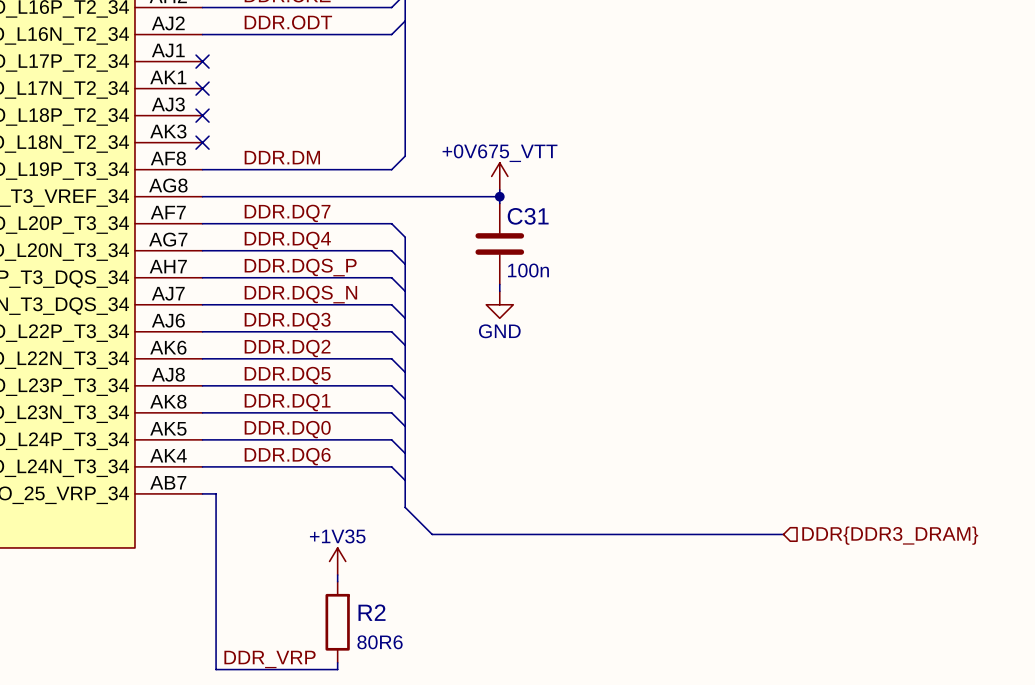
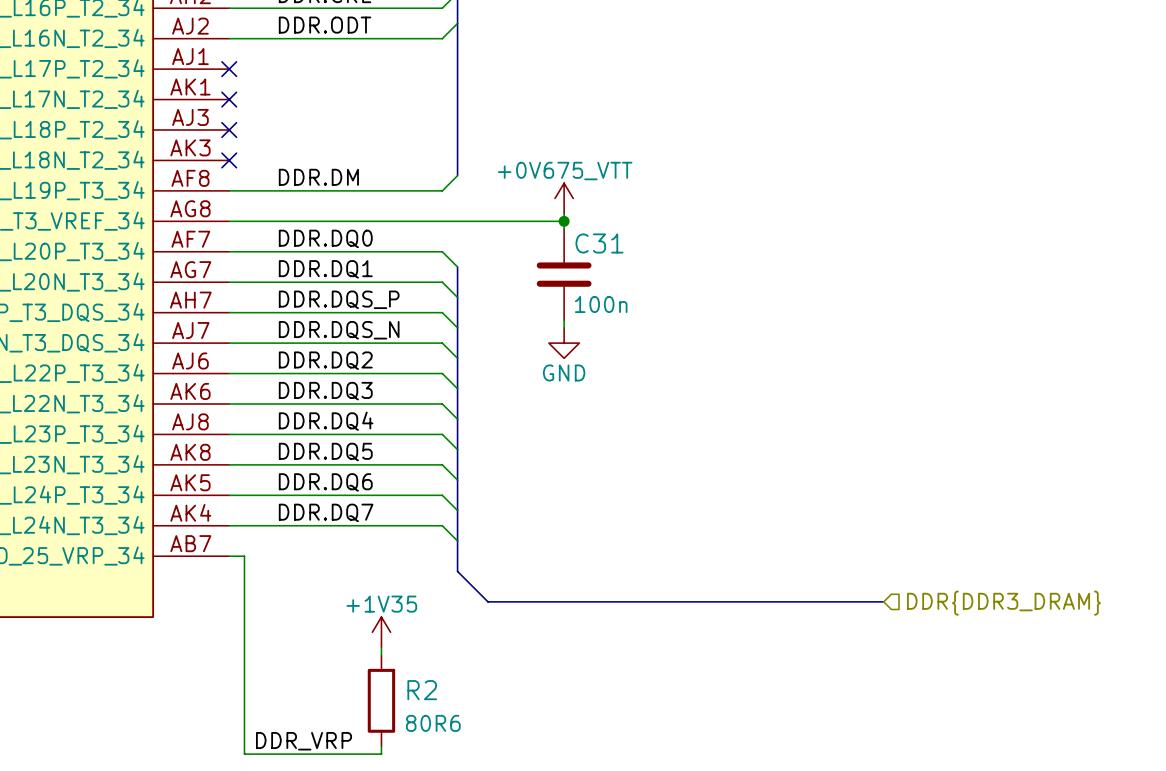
label: DDR.DQ7 (287, 213) -> DDR.DQ0 (325, 238)
label: DDR.DQ4 (287, 240) -> DDR.DQ1 (325, 269)
label: DDR.DQ3 (287, 321) -> DDR.DQ2 (325, 360)
label: DDR.DQ2 (287, 348) -> DDR.DQ3 (325, 391)
label: DDR.DQ5 (287, 375) -> DDR.DQ4 (326, 421)
label: DDR.DQ1 (287, 402) -> DDR.DQ5 (325, 452)
label: DDR.DQ0 (287, 429) -> DDR.DQ6 (325, 482)
label: DDR.DQ6 (287, 456) -> DDR.DQ7 (326, 512)

